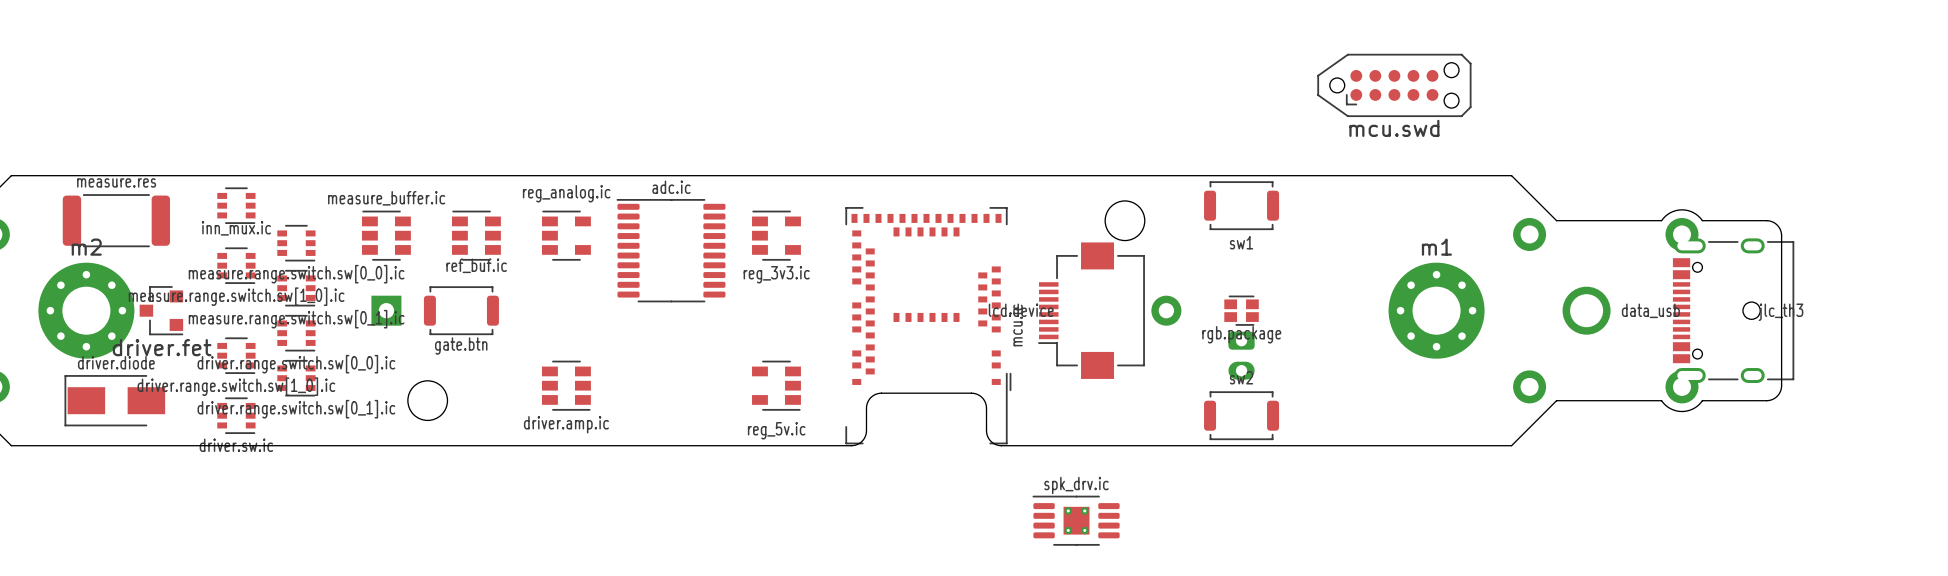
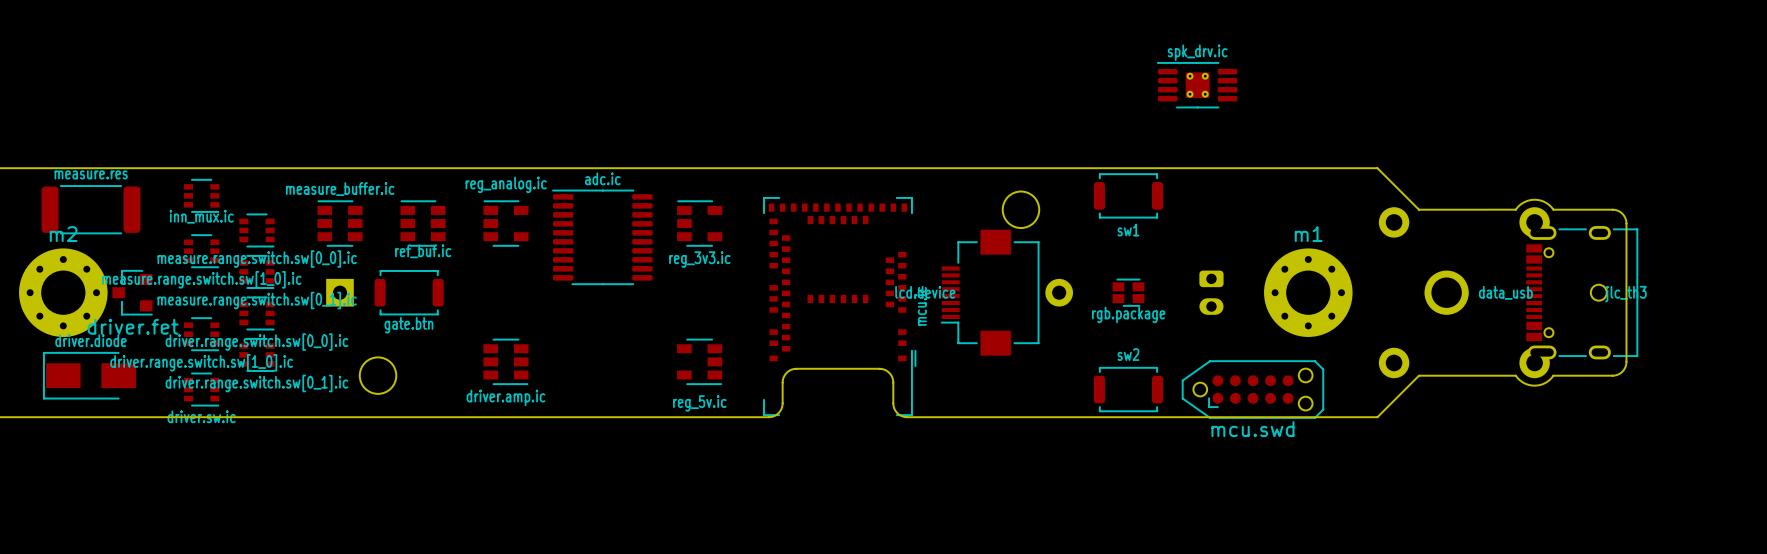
spk_drv.ic: none -> (1197, 85)
mcu.swd position: (1394, 85) -> (1252, 389)
part position: (1241, 355) -> (1211, 292)
spk_drv.ic: (1076, 520) -> none

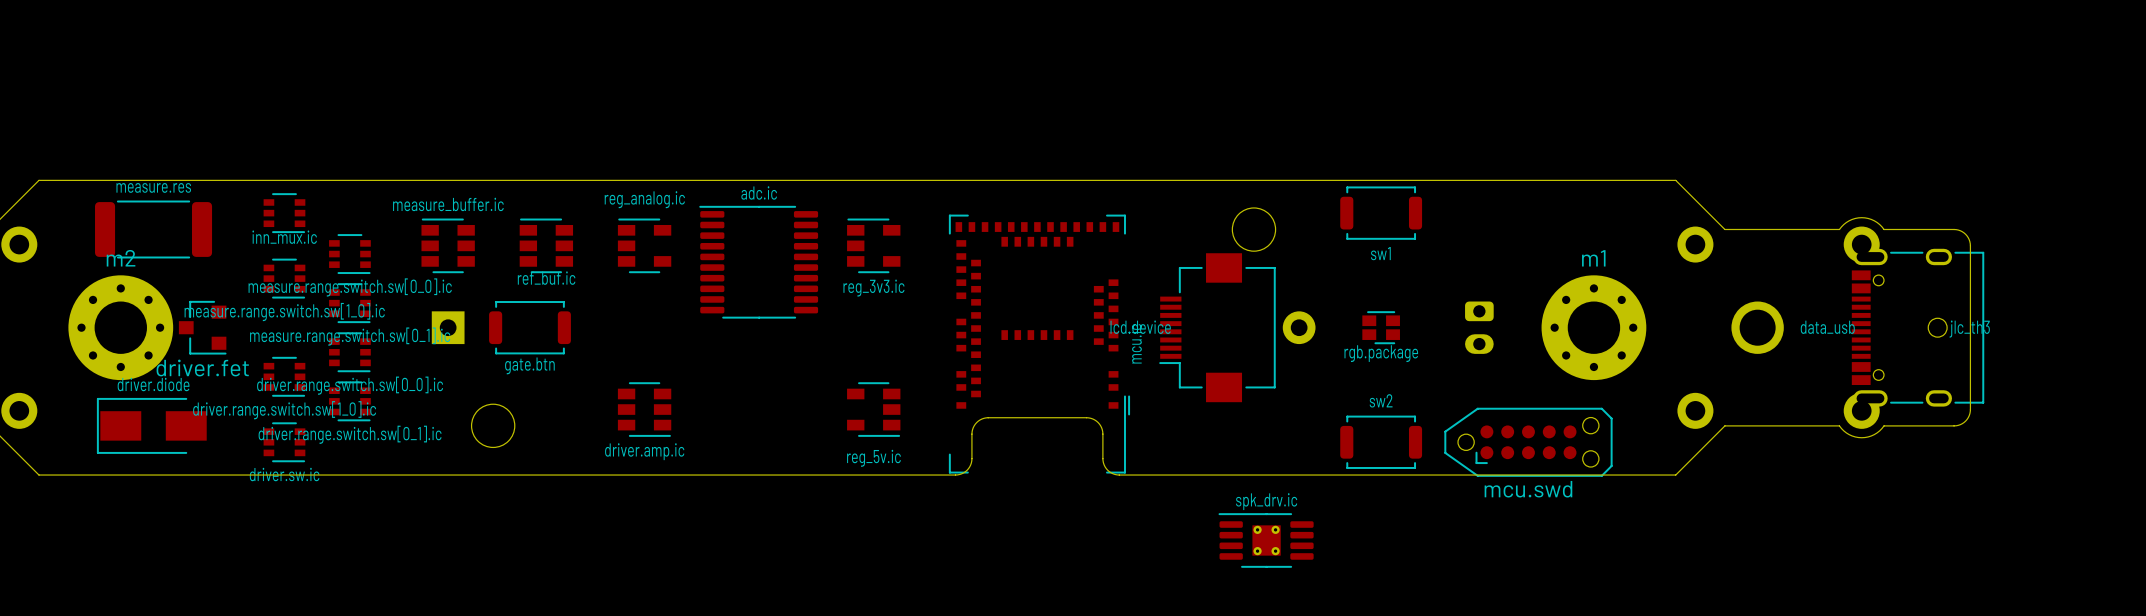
spk_drv.ic: (1197, 85) -> none
spk_drv.ic: none -> (1266, 540)

